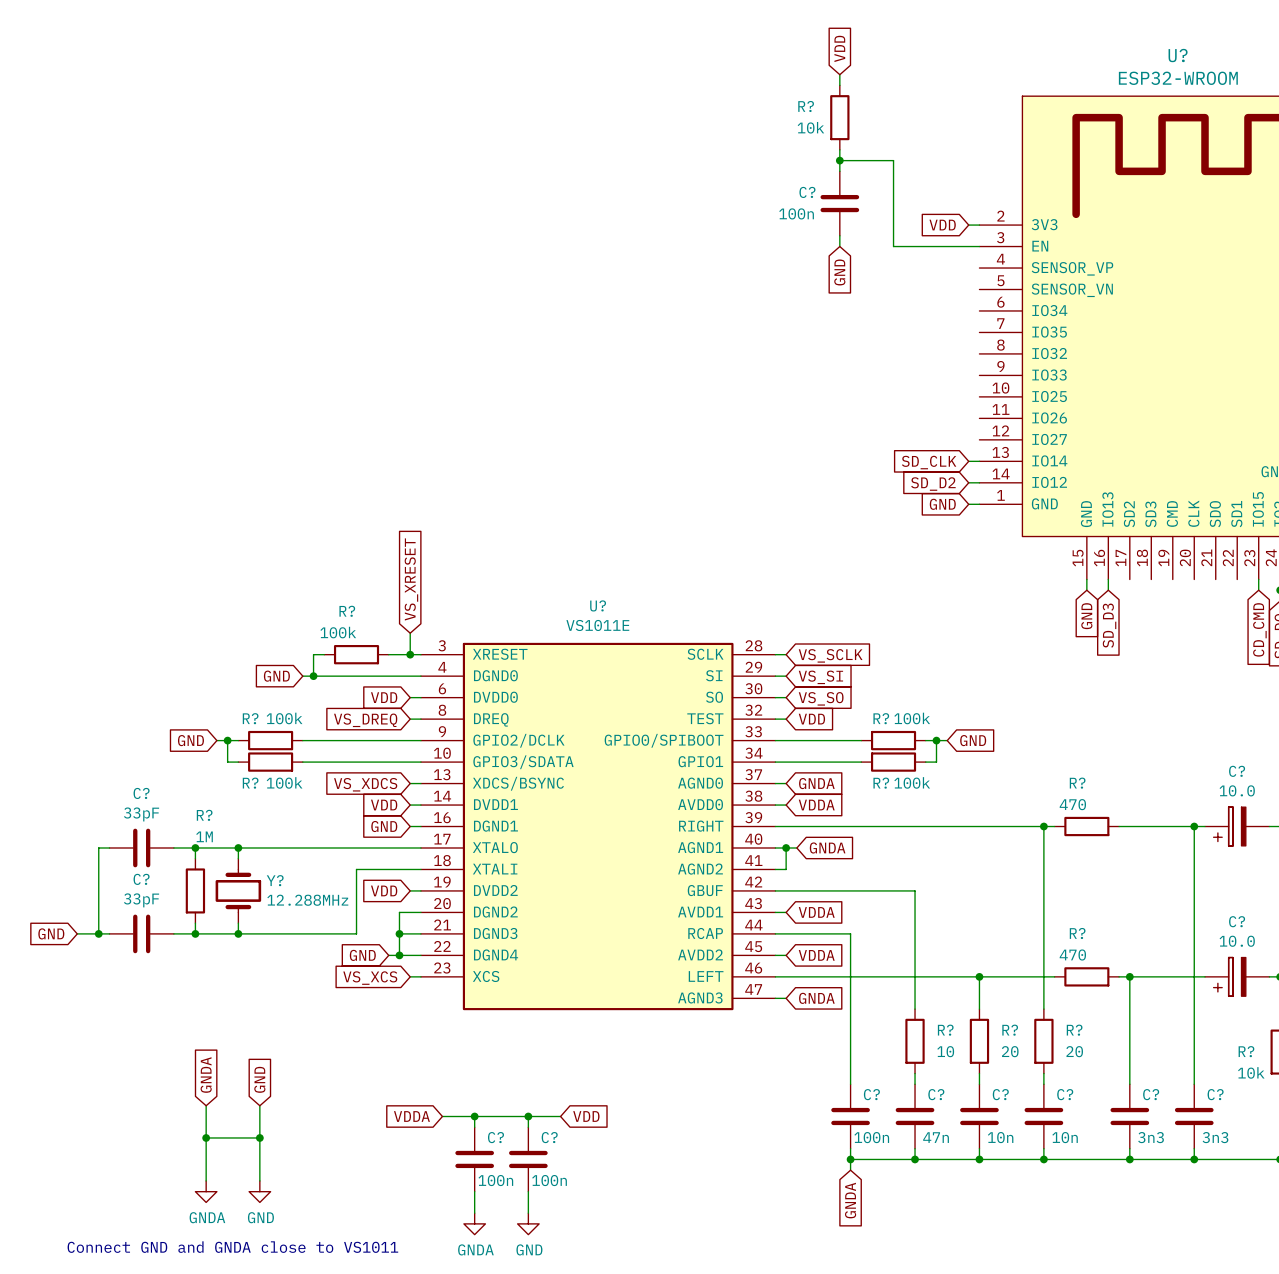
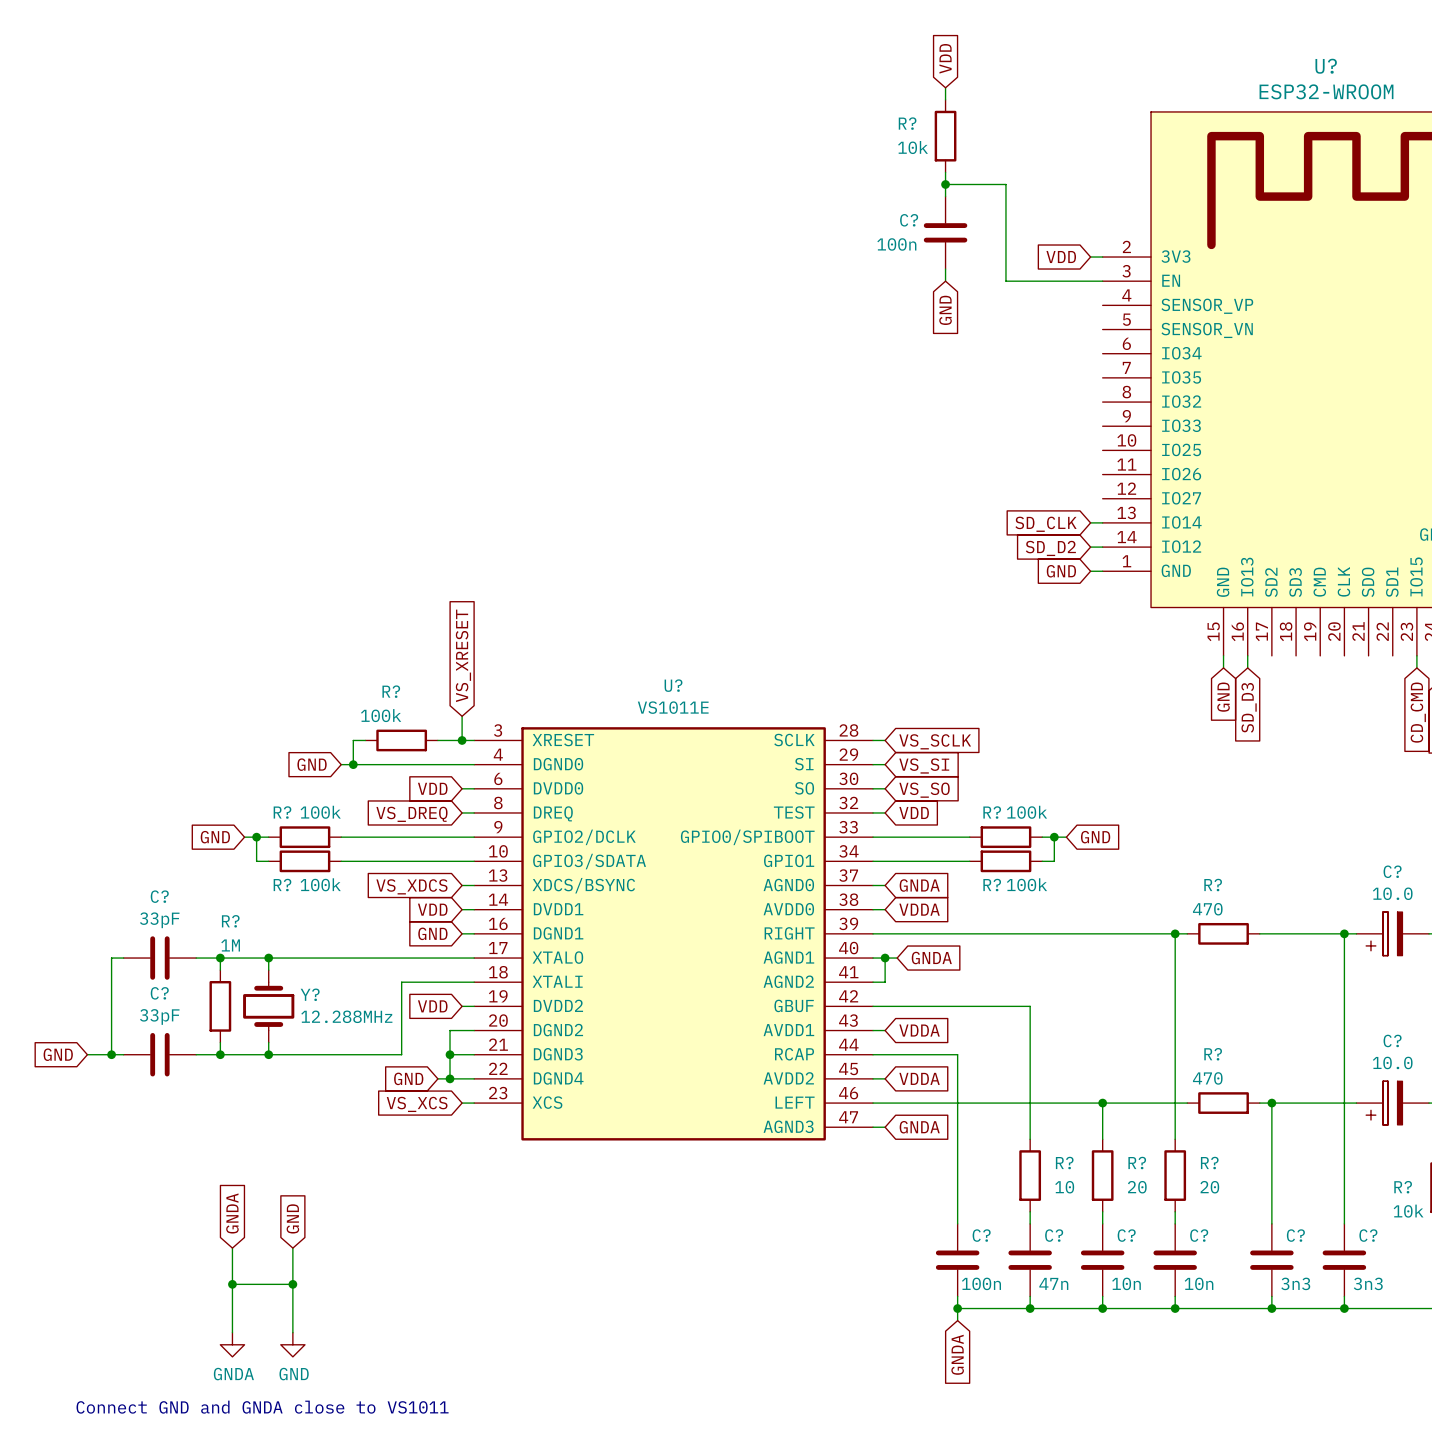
global label: VDDA (411, 1116) -> none
wire: (442, 1116) (560, 1116) -> none
wire: (474, 1116) (474, 1127) -> none
junction: (474, 1116) -> none
wire: (528, 1116) (528, 1127) -> none
junction: (528, 1116) -> none
global label: VDD (586, 1116) -> none
C?: 100n (474, 1159) -> none
C?: 100n (528, 1159) -> none
wire: (474, 1191) (474, 1213) -> none
wire: (528, 1191) (528, 1213) -> none
power symbol: GNDA (474, 1223) -> none
power symbol: GND (528, 1223) -> none

